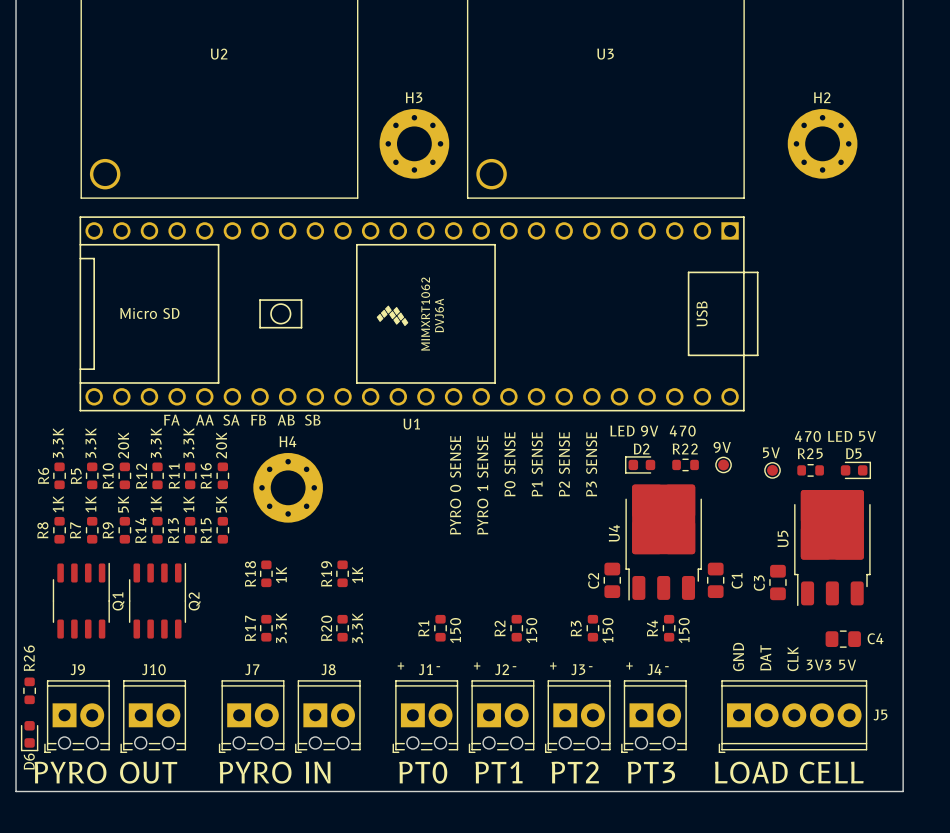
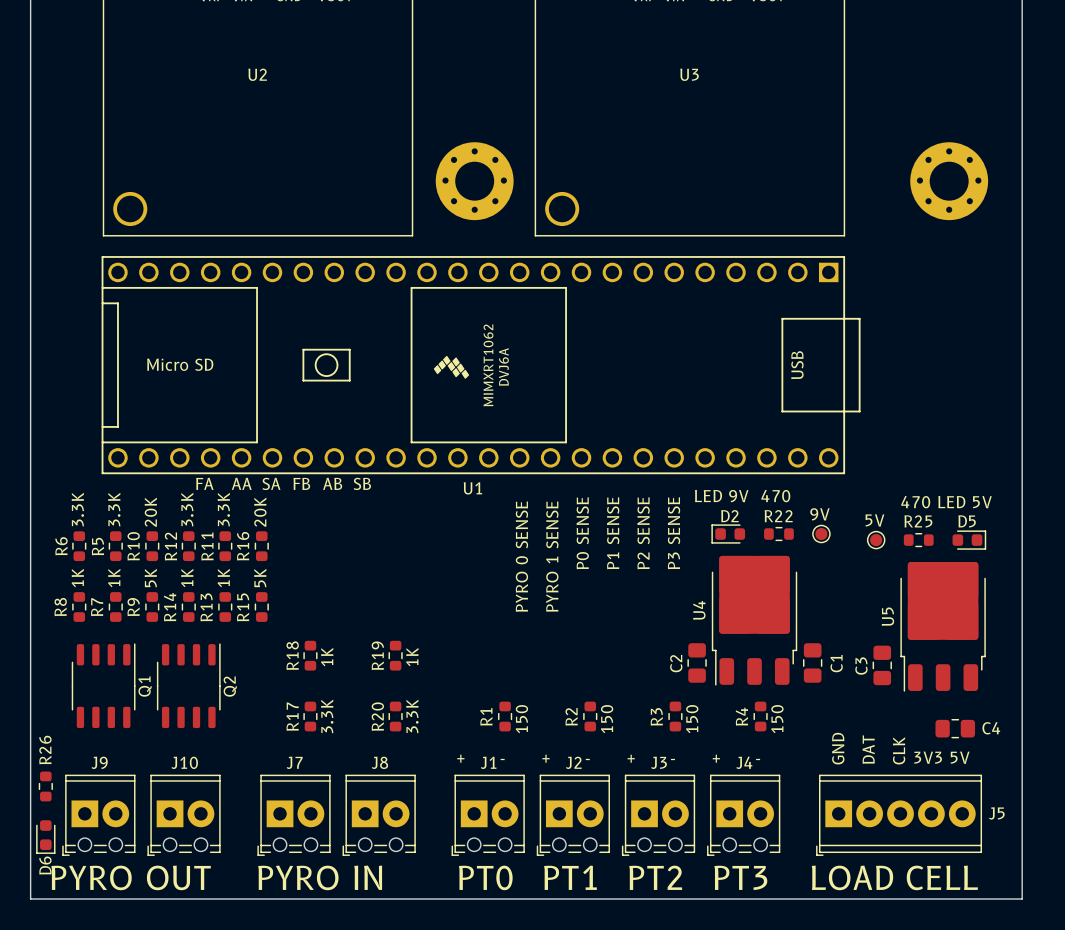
H3: (414, 143) -> none
H2: (822, 143) -> none
part: none -> (474, 181)
part: none -> (949, 181)
H4: (288, 487) -> none

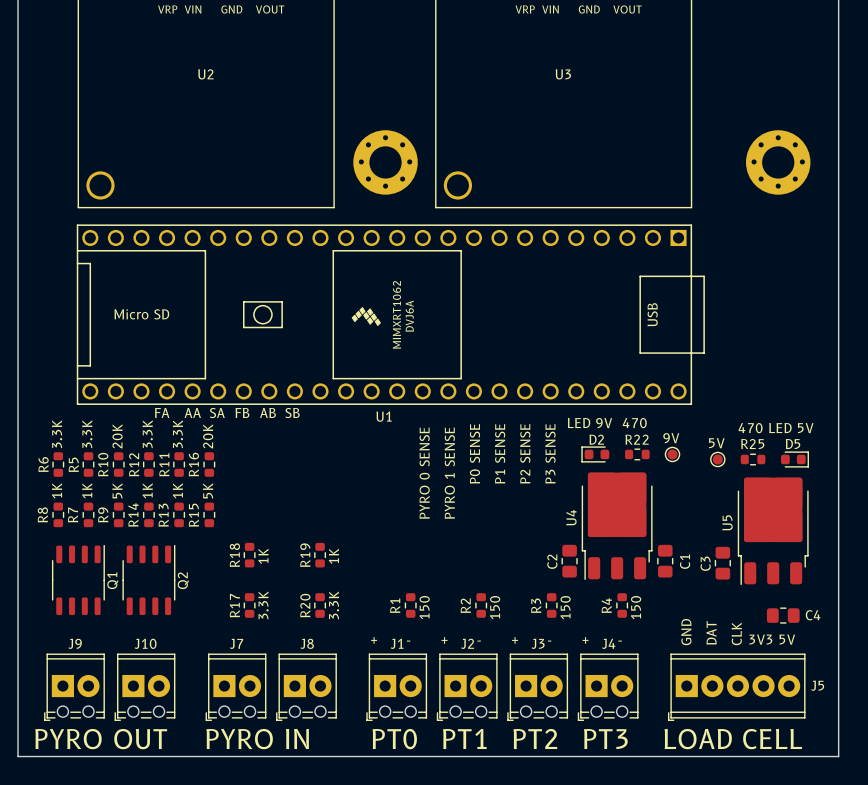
R26: (45, 786) -> none
D6: (45, 837) -> none

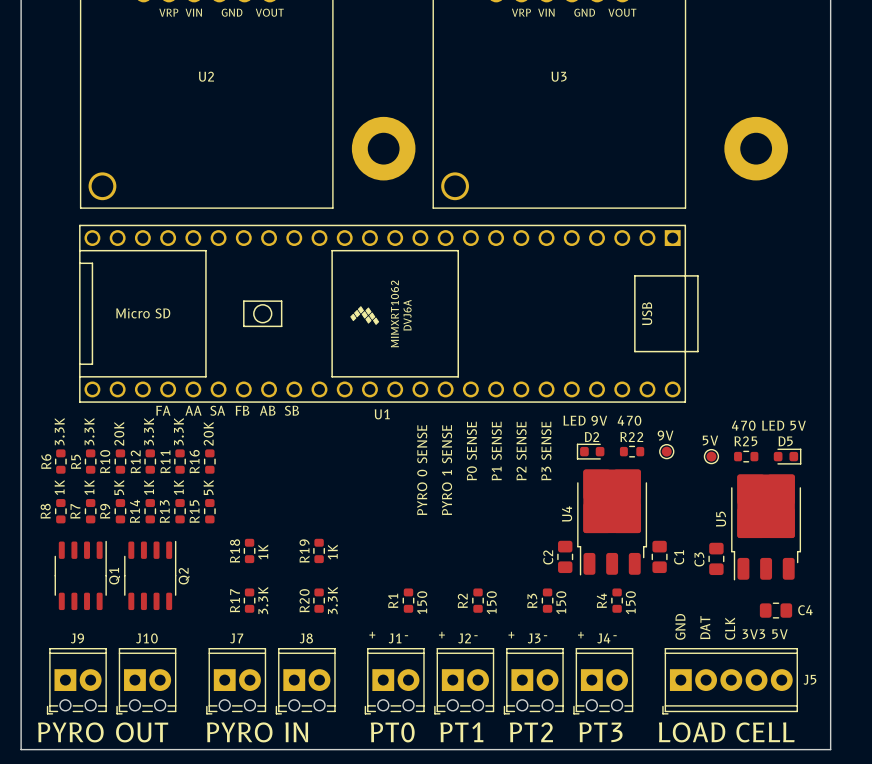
part: none -> (383, 148)
part: none -> (756, 148)
part: (385, 162) -> none
part: (778, 162) -> none

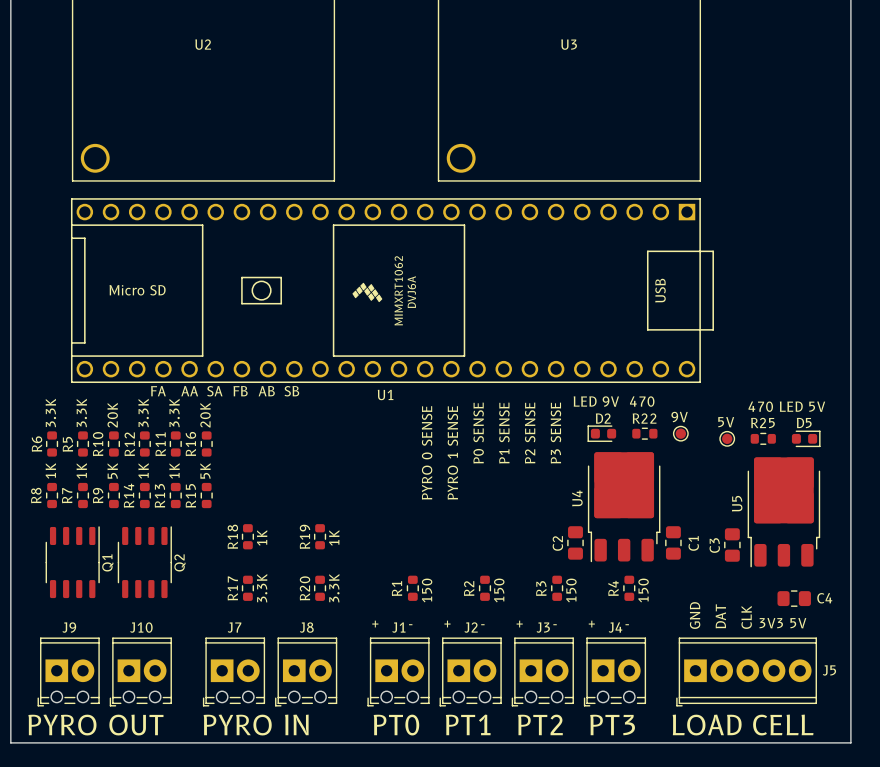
part: (383, 148) -> none
part: (756, 148) -> none

